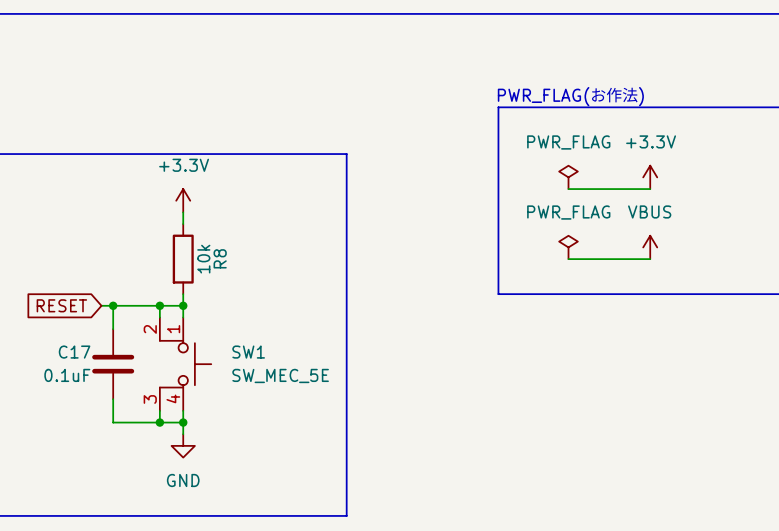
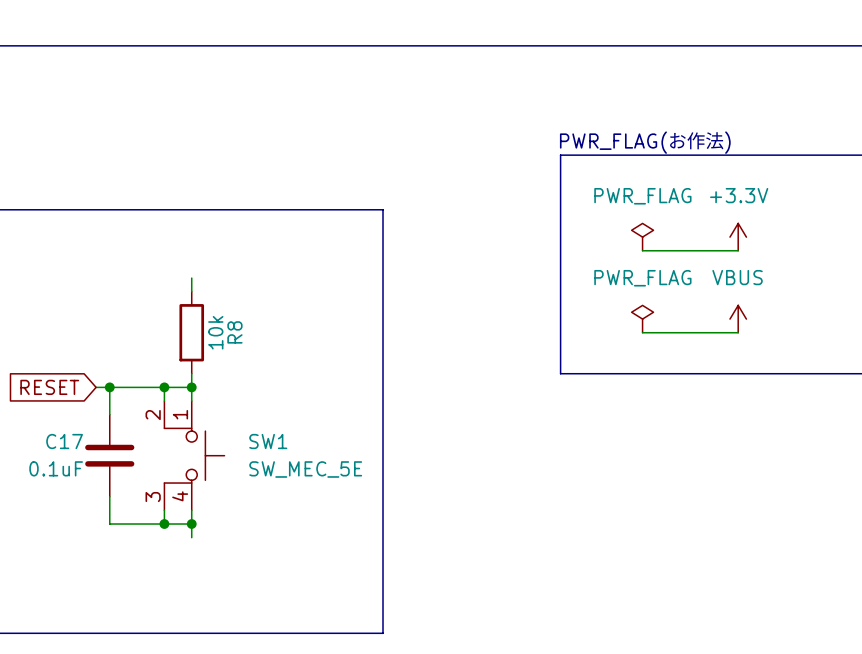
power symbol: +3.3V (183, 200) -> none
power symbol: GND (183, 445) -> none

